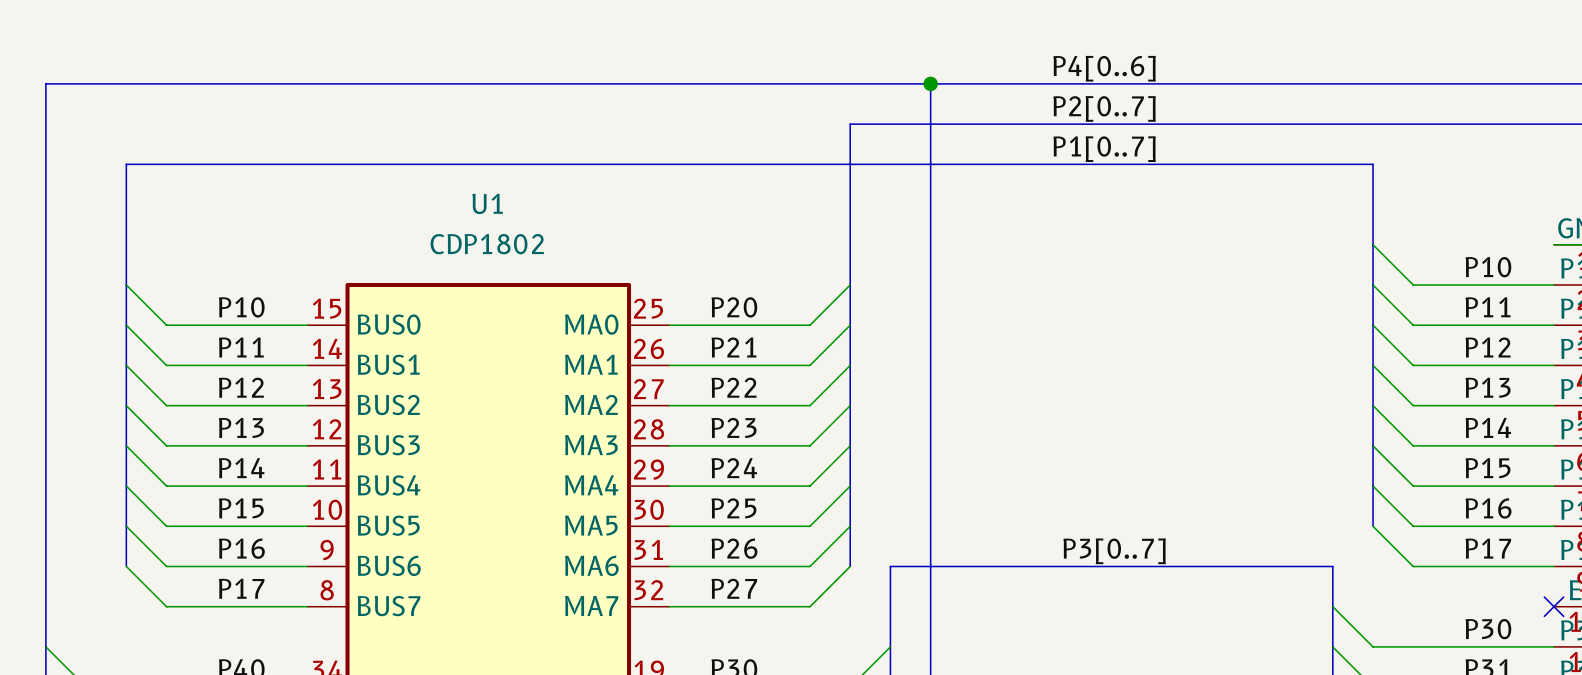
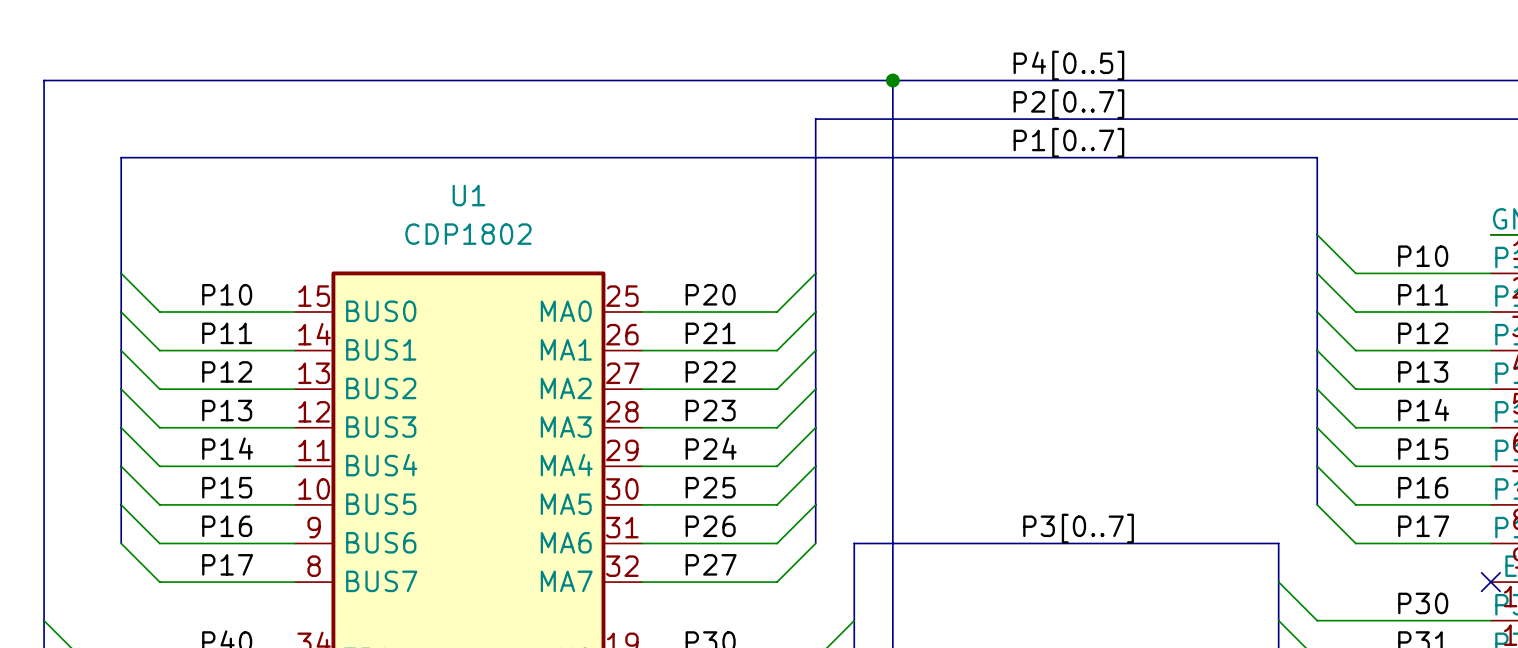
label: P4[0..6] (1104, 68) -> P4[0..5] (1068, 65)

